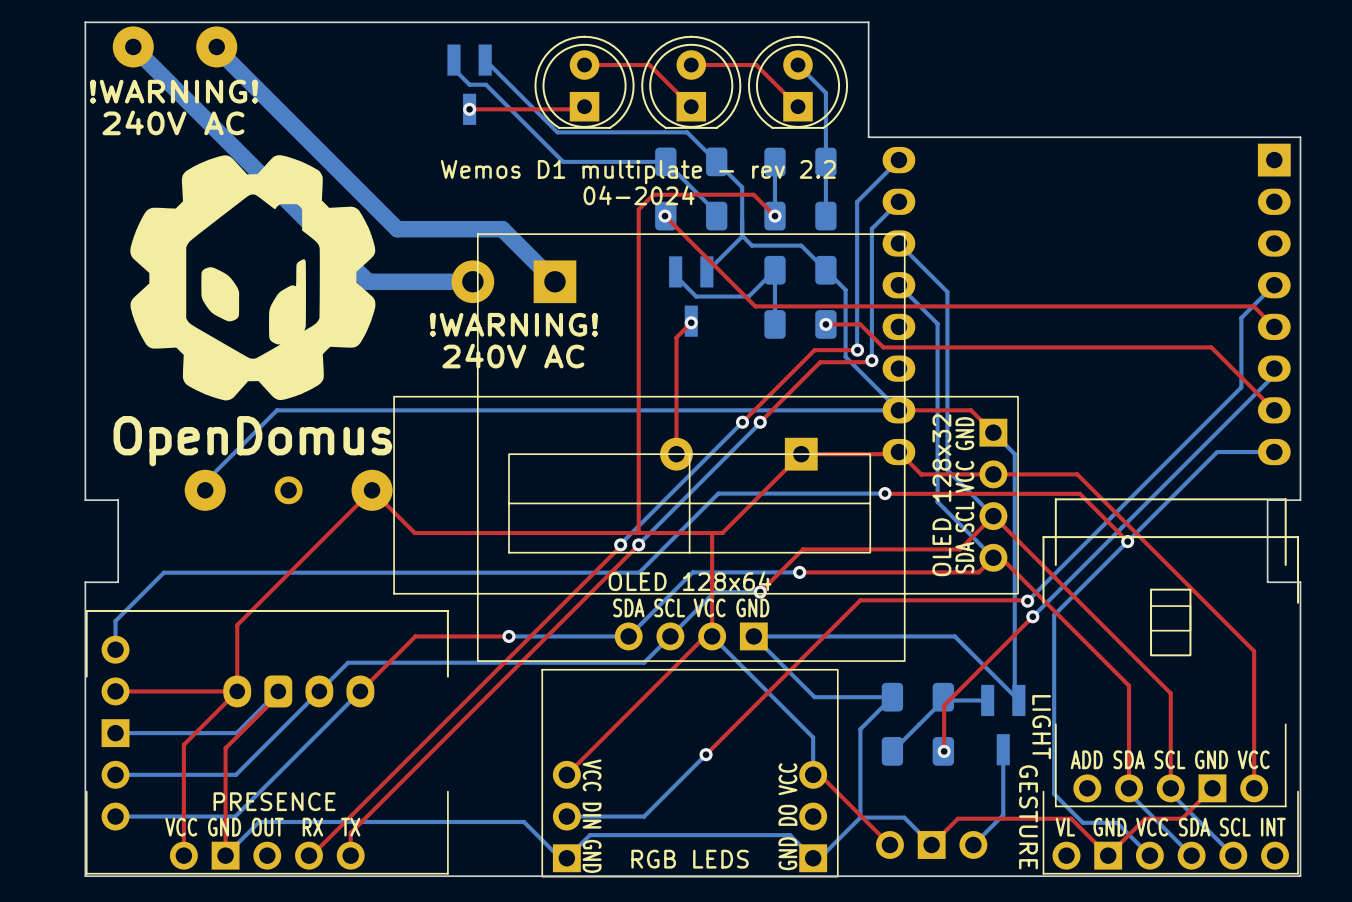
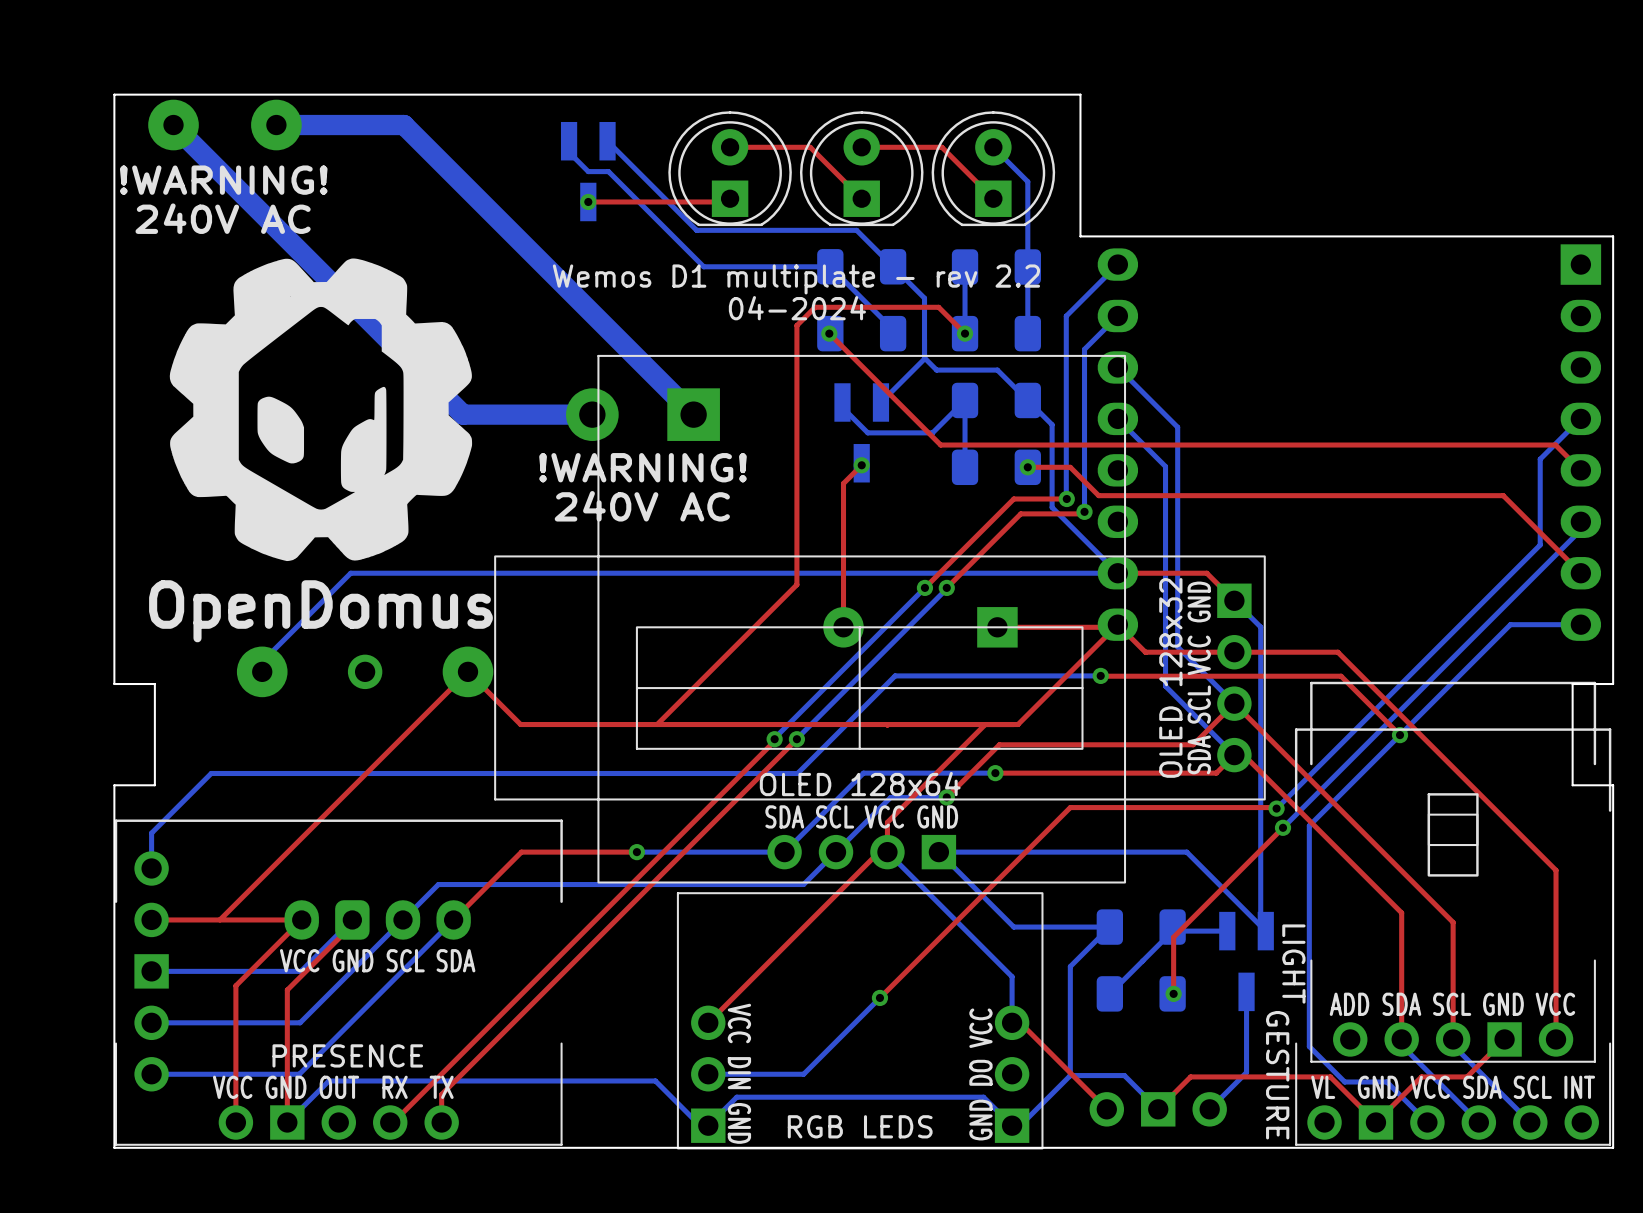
bottom track: (216, 46) (397, 229) (502, 229) -> (276, 125) (404, 125) (628, 349)
top track: (638, 419) (638, 532) -> (796, 584) (657, 724)
top track: (801, 454) (722, 532) -> (1115, 627) (1018, 724) (900, 724)
top track: (712, 533) (712, 612) -> (985, 724) (887, 822)
top track: (237, 625) (237, 691) -> (301, 838) (219, 919)
text: none -> VCC GND SCL SDA (377, 960)

